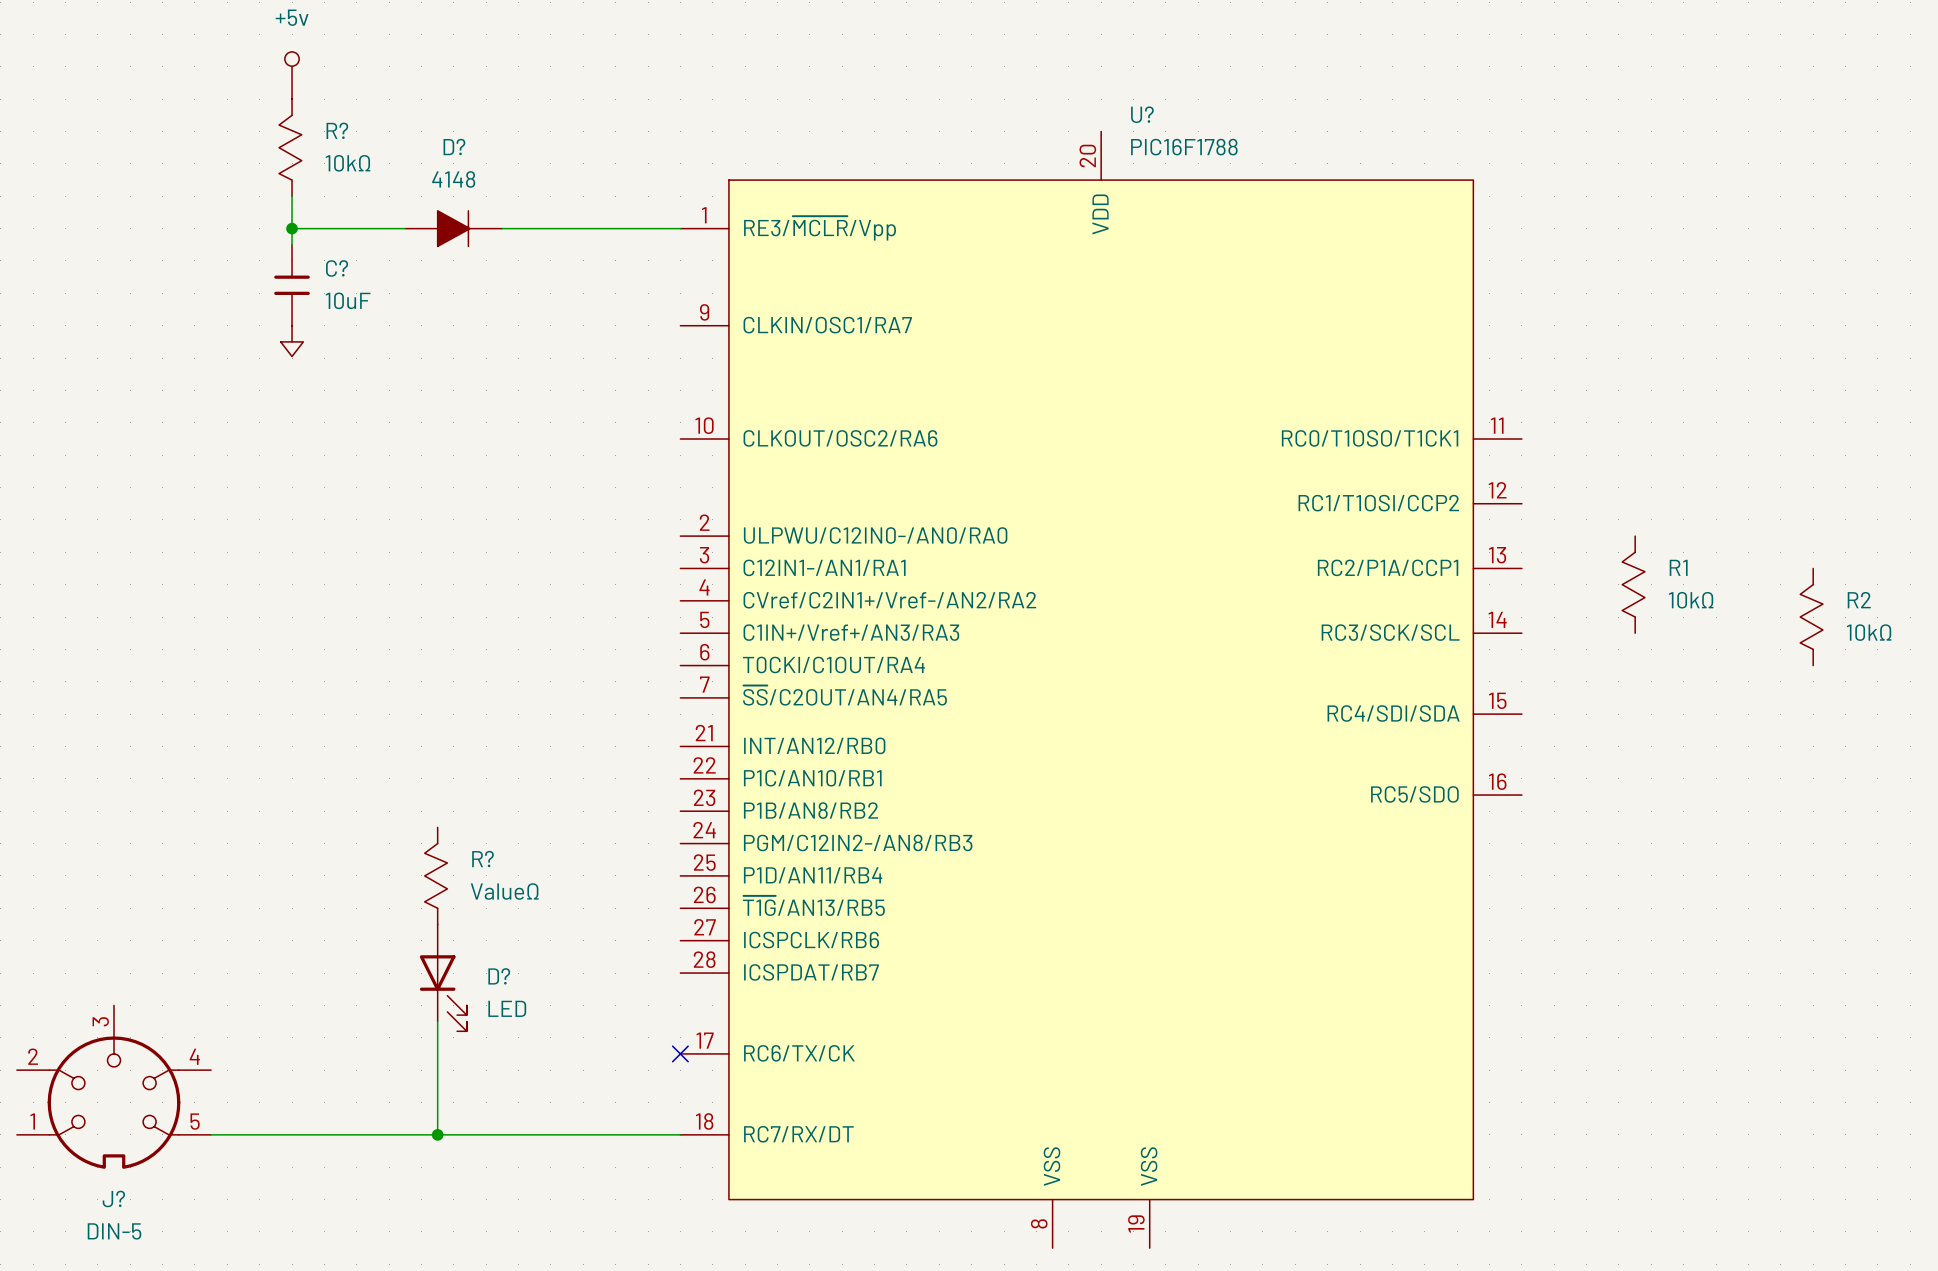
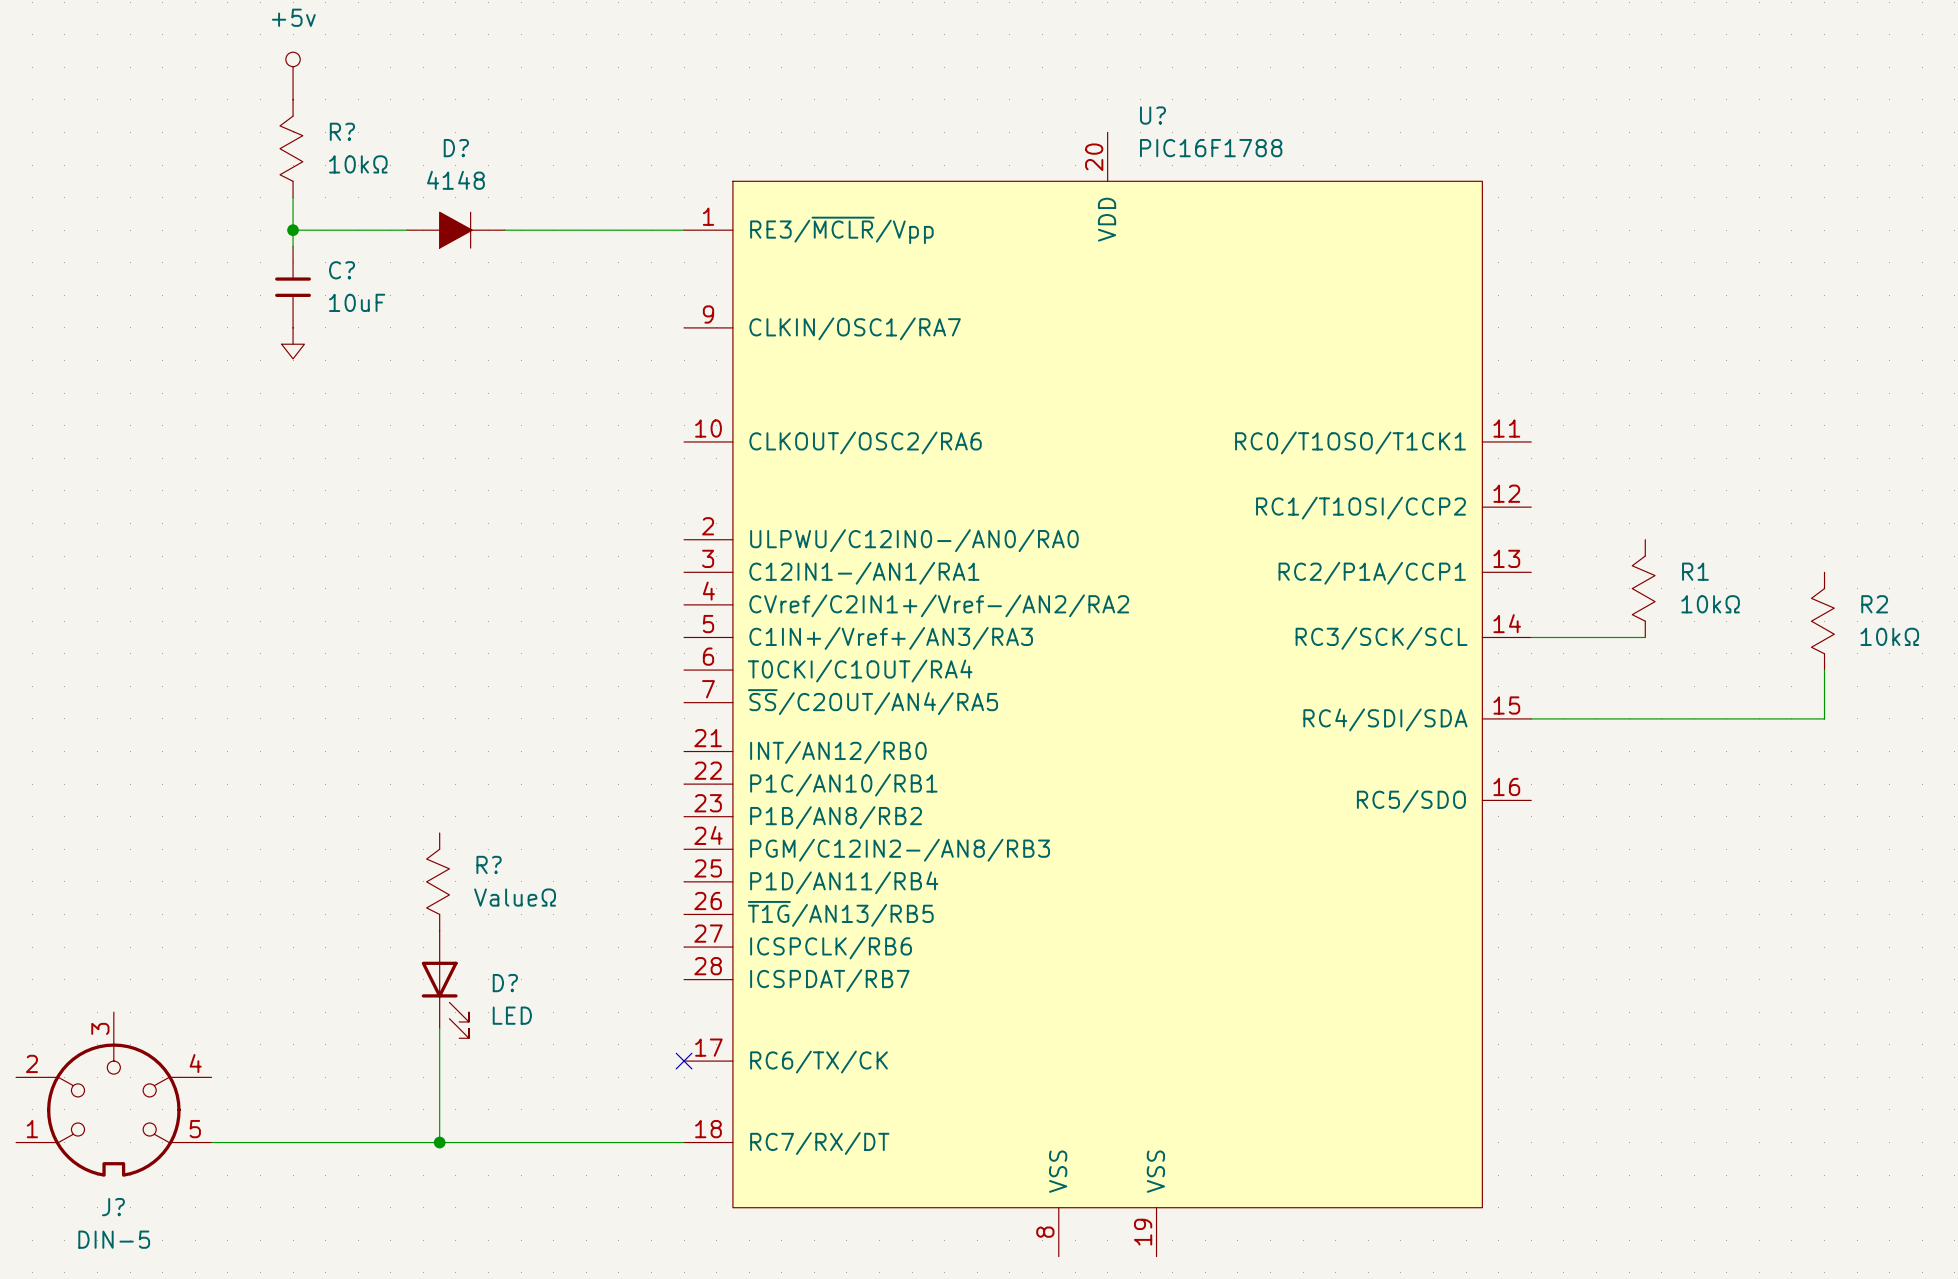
wire: none -> (1531, 637) (1645, 637)
wire: none -> (1824, 670) (1824, 718) (1531, 718)

